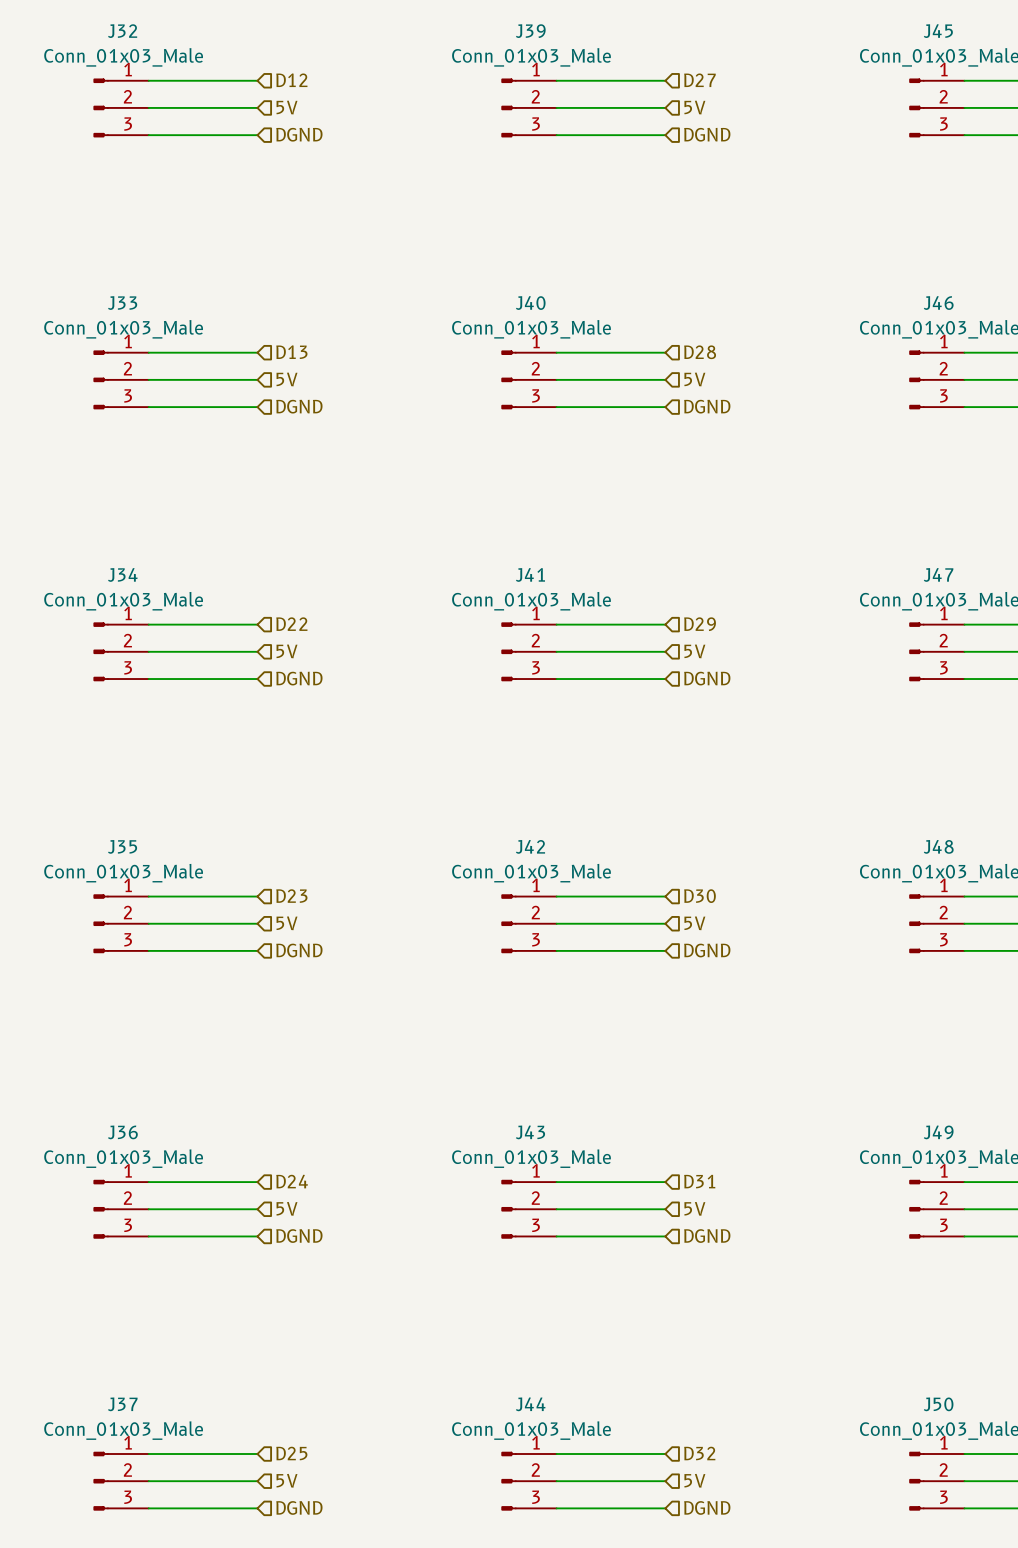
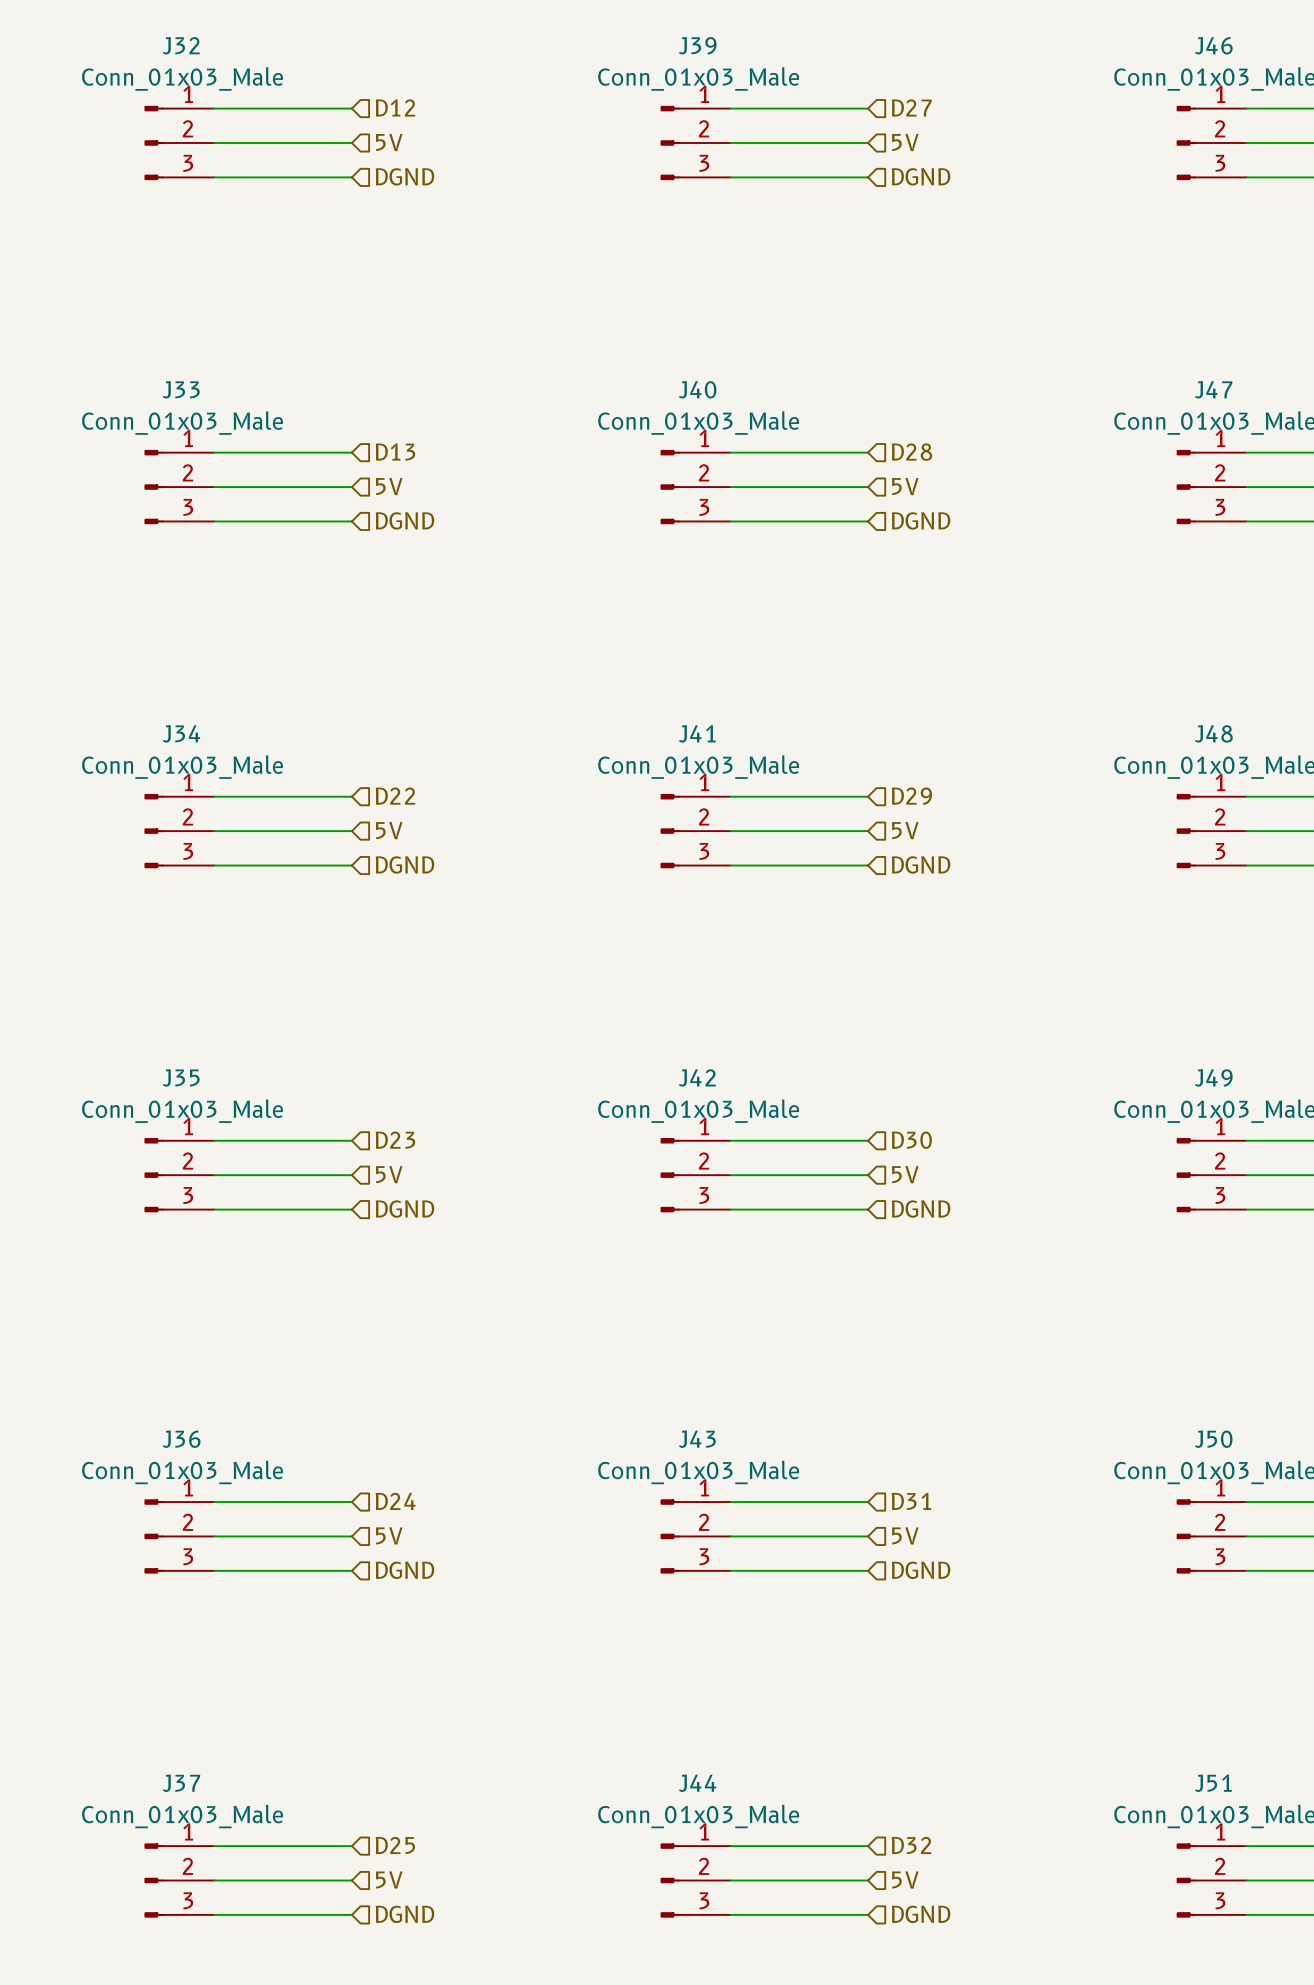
J45 name: J45 (938, 31) -> J46 (1213, 45)
J46 name: J46 (938, 303) -> J47 (1213, 389)
J47 name: J47 (938, 574) -> J48 (1213, 733)
J48 name: J48 (938, 846) -> J49 (1213, 1077)
J49 name: J49 (938, 1132) -> J50 (1213, 1439)
J50 name: J50 (938, 1404) -> J51 (1213, 1783)

